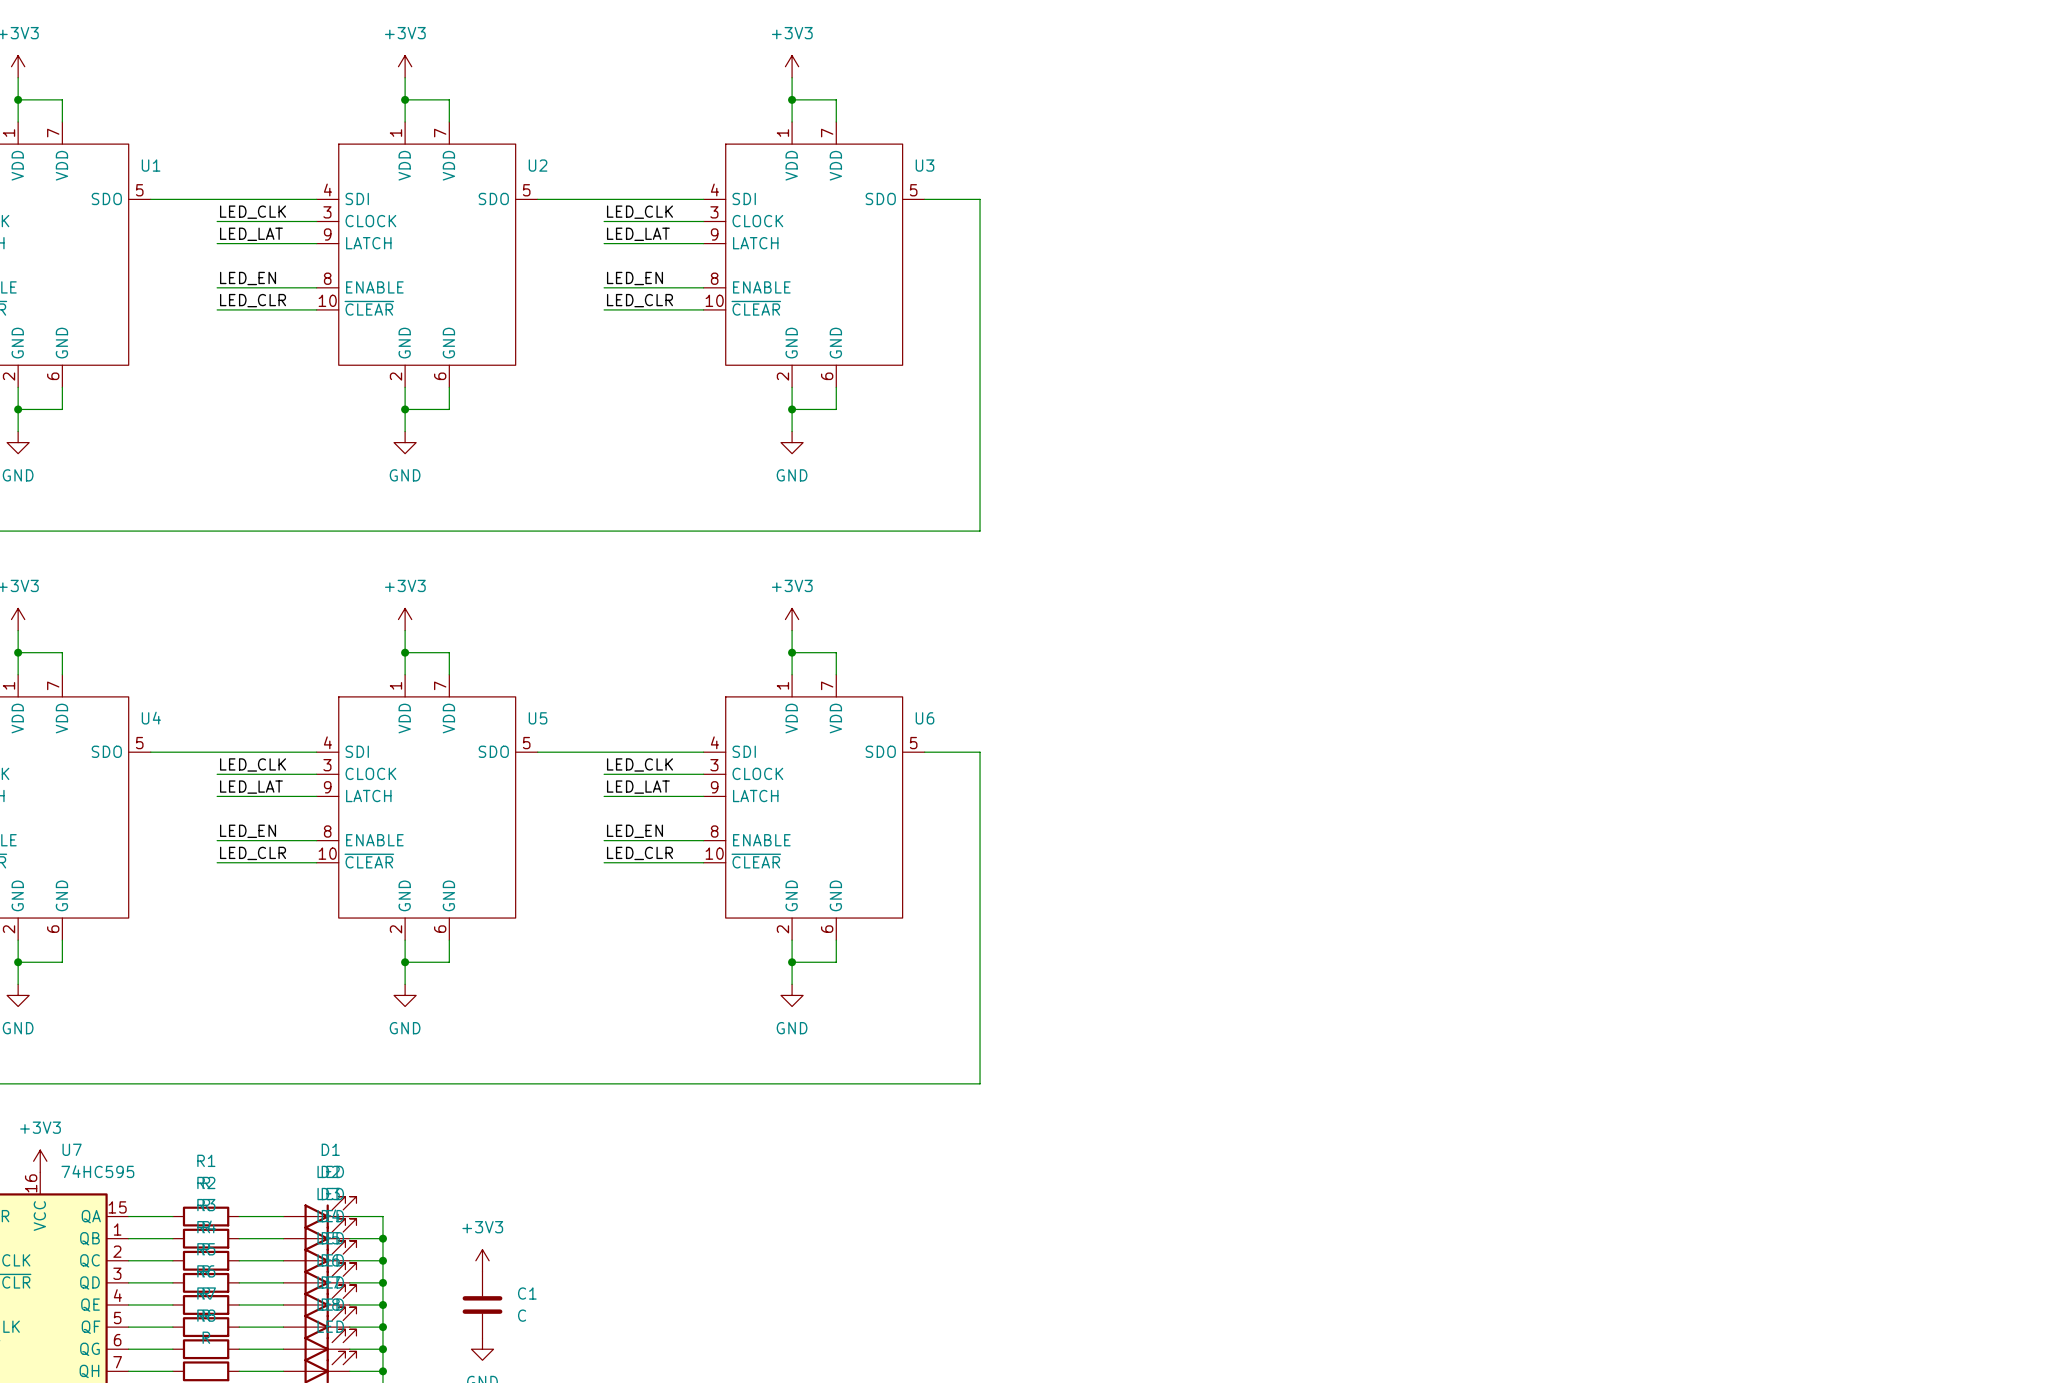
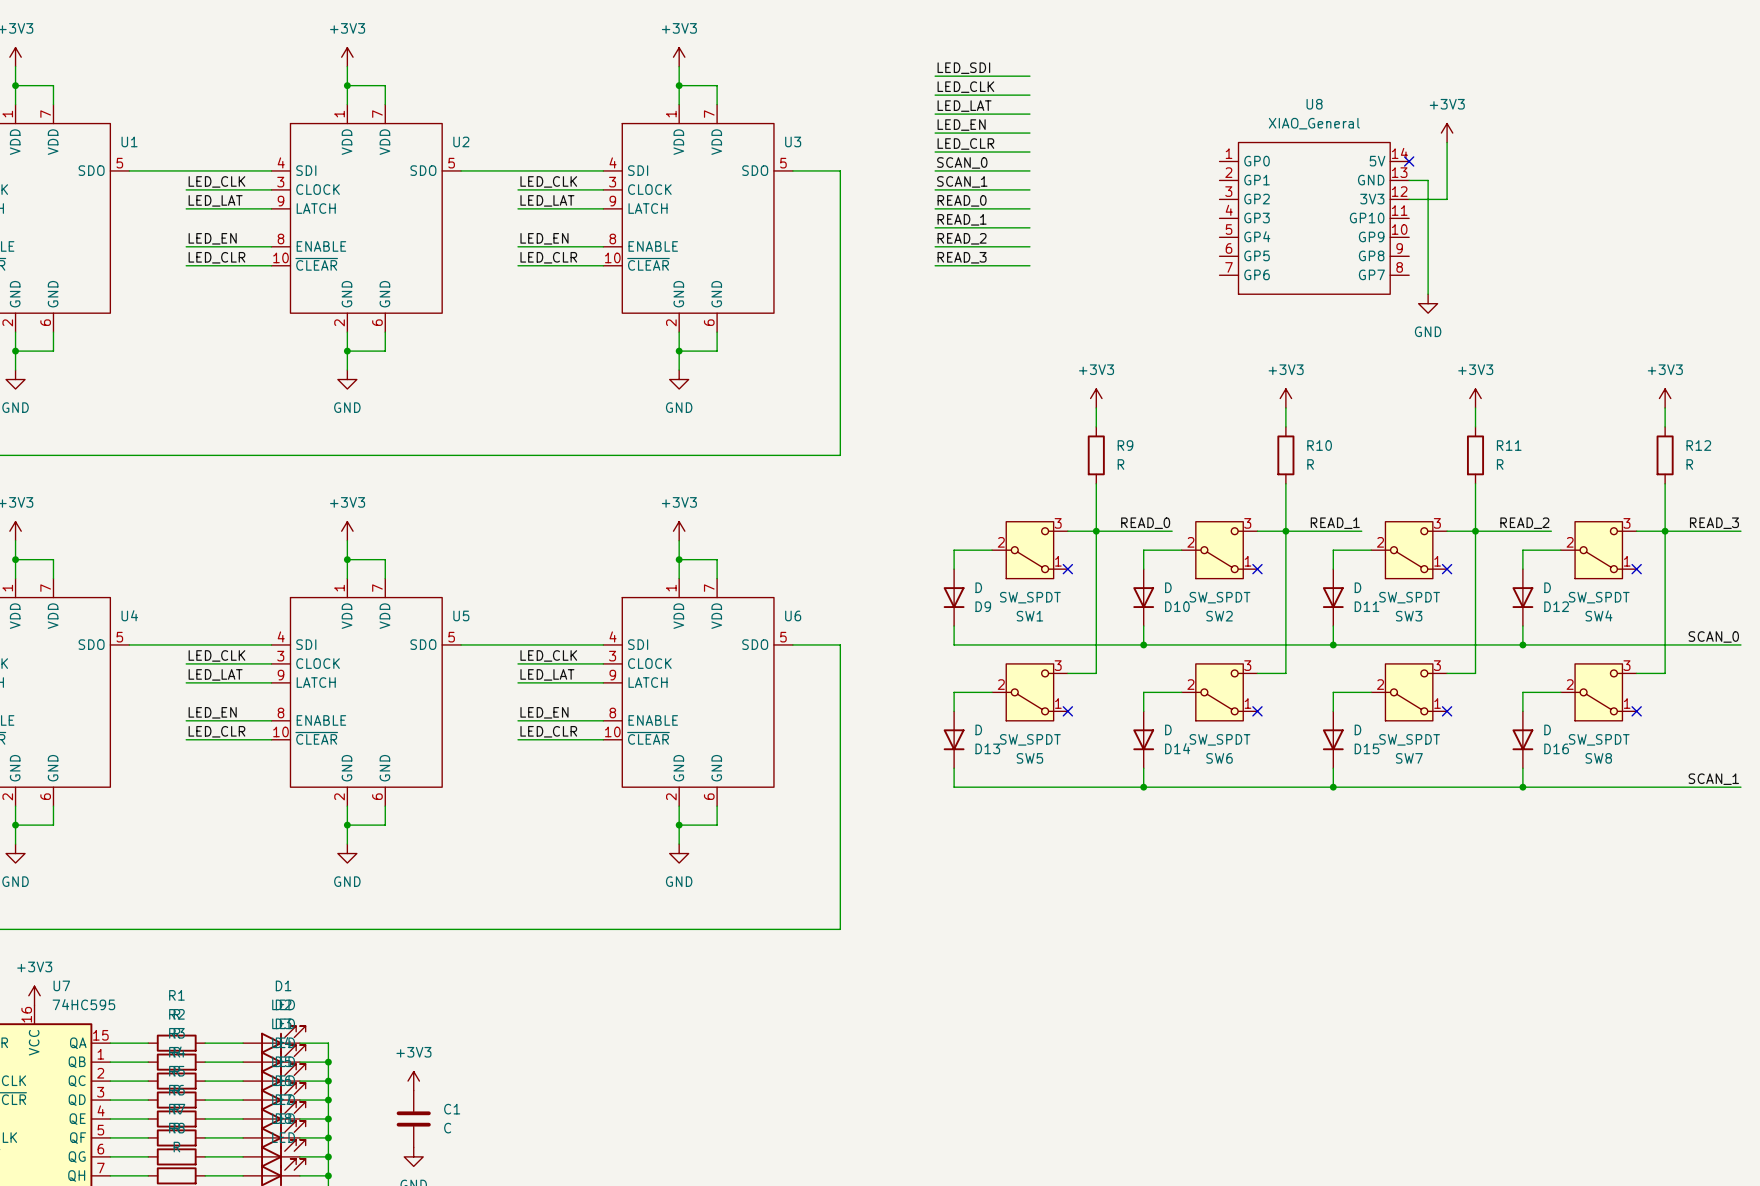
label: none -> LED_SDI (963, 68)
wire: none -> (935, 76) (1029, 76)
label: none -> LED_CLK (965, 87)
wire: none -> (935, 95) (1029, 95)
label: none -> LED_LAT (964, 106)
wire: none -> (935, 114) (1029, 114)
label: none -> LED_EN (961, 125)
wire: none -> (935, 133) (1029, 133)
power symbol: none -> +3V3 (1447, 133)
wire: none -> (1447, 142) (1447, 199) (1409, 199)
label: none -> LED_CLR (965, 143)
wire: none -> (935, 152) (1029, 152)
no-connect mark: none -> (1409, 161)
label: none -> SCAN_0 (962, 162)
wire: none -> (935, 170) (1029, 170)
wire: none -> (1409, 180) (1428, 180) (1428, 294)
label: none -> SCAN_1 (962, 181)
wire: none -> (935, 189) (1029, 189)
label: none -> READ_0 (962, 200)
wire: none -> (935, 208) (1029, 208)
U8: none -> XIAO_General (1314, 218)
label: none -> READ_1 (962, 219)
wire: none -> (935, 227) (1029, 227)
label: none -> READ_2 (962, 238)
wire: none -> (935, 246) (1029, 246)
label: none -> READ_3 (962, 257)
wire: none -> (935, 265) (1029, 265)
power symbol: none -> GND (1428, 303)
power symbol: none -> +3V3 (1096, 398)
power symbol: none -> +3V3 (1285, 398)
power symbol: none -> +3V3 (1475, 398)
power symbol: none -> +3V3 (1665, 398)
wire: none -> (1096, 407) (1096, 426)
wire: none -> (1285, 407) (1285, 426)
wire: none -> (1475, 407) (1475, 426)
wire: none -> (1665, 407) (1665, 426)
R9: none -> R (1096, 455)
R10: none -> R (1285, 455)
R11: none -> R (1475, 455)
R12: none -> R (1665, 455)
wire: none -> (1096, 483) (1096, 673) (1067, 673)
wire: none -> (1285, 483) (1285, 673) (1257, 673)
wire: none -> (1475, 483) (1475, 673) (1447, 673)
wire: none -> (1665, 483) (1665, 673) (1636, 673)
label: none -> READ_0 (1145, 523)
label: none -> READ_1 (1335, 523)
label: none -> READ_2 (1524, 523)
label: none -> READ_3 (1714, 523)
wire: none -> (1067, 531) (1172, 531)
junction: none -> (1096, 531)
wire: none -> (1257, 531) (1361, 531)
junction: none -> (1285, 531)
wire: none -> (1447, 531) (1551, 531)
junction: none -> (1475, 531)
wire: none -> (1636, 531) (1740, 531)
junction: none -> (1665, 531)
wire: none -> (992, 550) (954, 550) (954, 569)
SW1: none -> SW_SPDT (1029, 550)
wire: none -> (1181, 550) (1143, 550) (1143, 569)
SW2: none -> SW_SPDT (1219, 550)
wire: none -> (1371, 550) (1333, 550) (1333, 569)
SW3: none -> SW_SPDT (1409, 550)
wire: none -> (1560, 550) (1522, 550) (1522, 569)
SW4: none -> SW_SPDT (1598, 550)
no-connect mark: none -> (1067, 569)
no-connect mark: none -> (1257, 569)
no-connect mark: none -> (1447, 569)
no-connect mark: none -> (1636, 569)
D9: none -> D (954, 597)
D10: none -> D (1143, 597)
D11: none -> D (1333, 597)
D12: none -> D (1522, 597)
wire: none -> (954, 626) (954, 644) (1740, 644)
wire: none -> (1143, 626) (1143, 644)
wire: none -> (1333, 626) (1333, 644)
wire: none -> (1522, 626) (1522, 644)
label: none -> SCAN_0 (1713, 636)
junction: none -> (1143, 644)
junction: none -> (1333, 644)
junction: none -> (1522, 644)
wire: none -> (992, 692) (954, 692) (954, 711)
SW5: none -> SW_SPDT (1029, 692)
wire: none -> (1181, 692) (1143, 692) (1143, 711)
SW6: none -> SW_SPDT (1219, 692)
wire: none -> (1371, 692) (1333, 692) (1333, 711)
SW7: none -> SW_SPDT (1409, 692)
wire: none -> (1560, 692) (1522, 692) (1522, 711)
SW8: none -> SW_SPDT (1598, 692)
no-connect mark: none -> (1067, 711)
no-connect mark: none -> (1257, 711)
no-connect mark: none -> (1447, 711)
no-connect mark: none -> (1636, 711)
D13: none -> D (954, 739)
D14: none -> D (1143, 739)
D15: none -> D (1333, 739)
D16: none -> D (1522, 739)
wire: none -> (954, 768) (954, 787) (1740, 787)
wire: none -> (1143, 768) (1143, 787)
wire: none -> (1333, 768) (1333, 787)
wire: none -> (1522, 768) (1522, 787)
label: none -> SCAN_1 (1713, 779)
junction: none -> (1143, 787)
junction: none -> (1333, 787)
junction: none -> (1522, 787)

